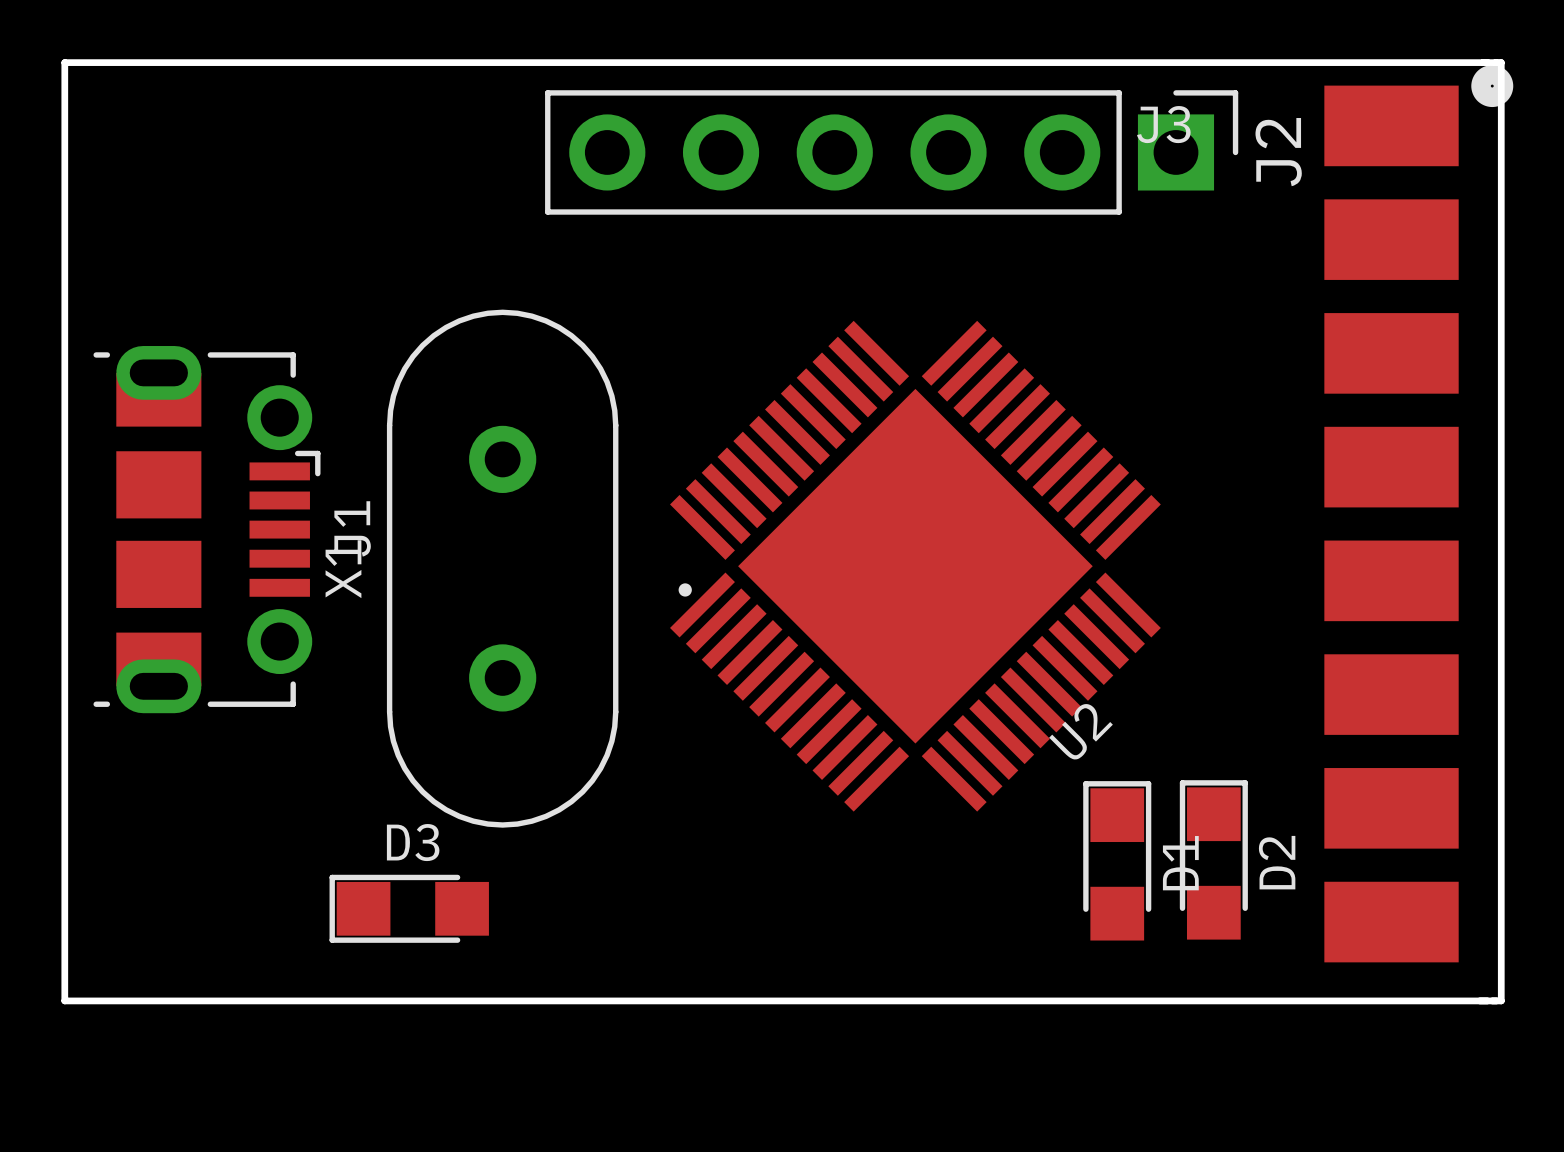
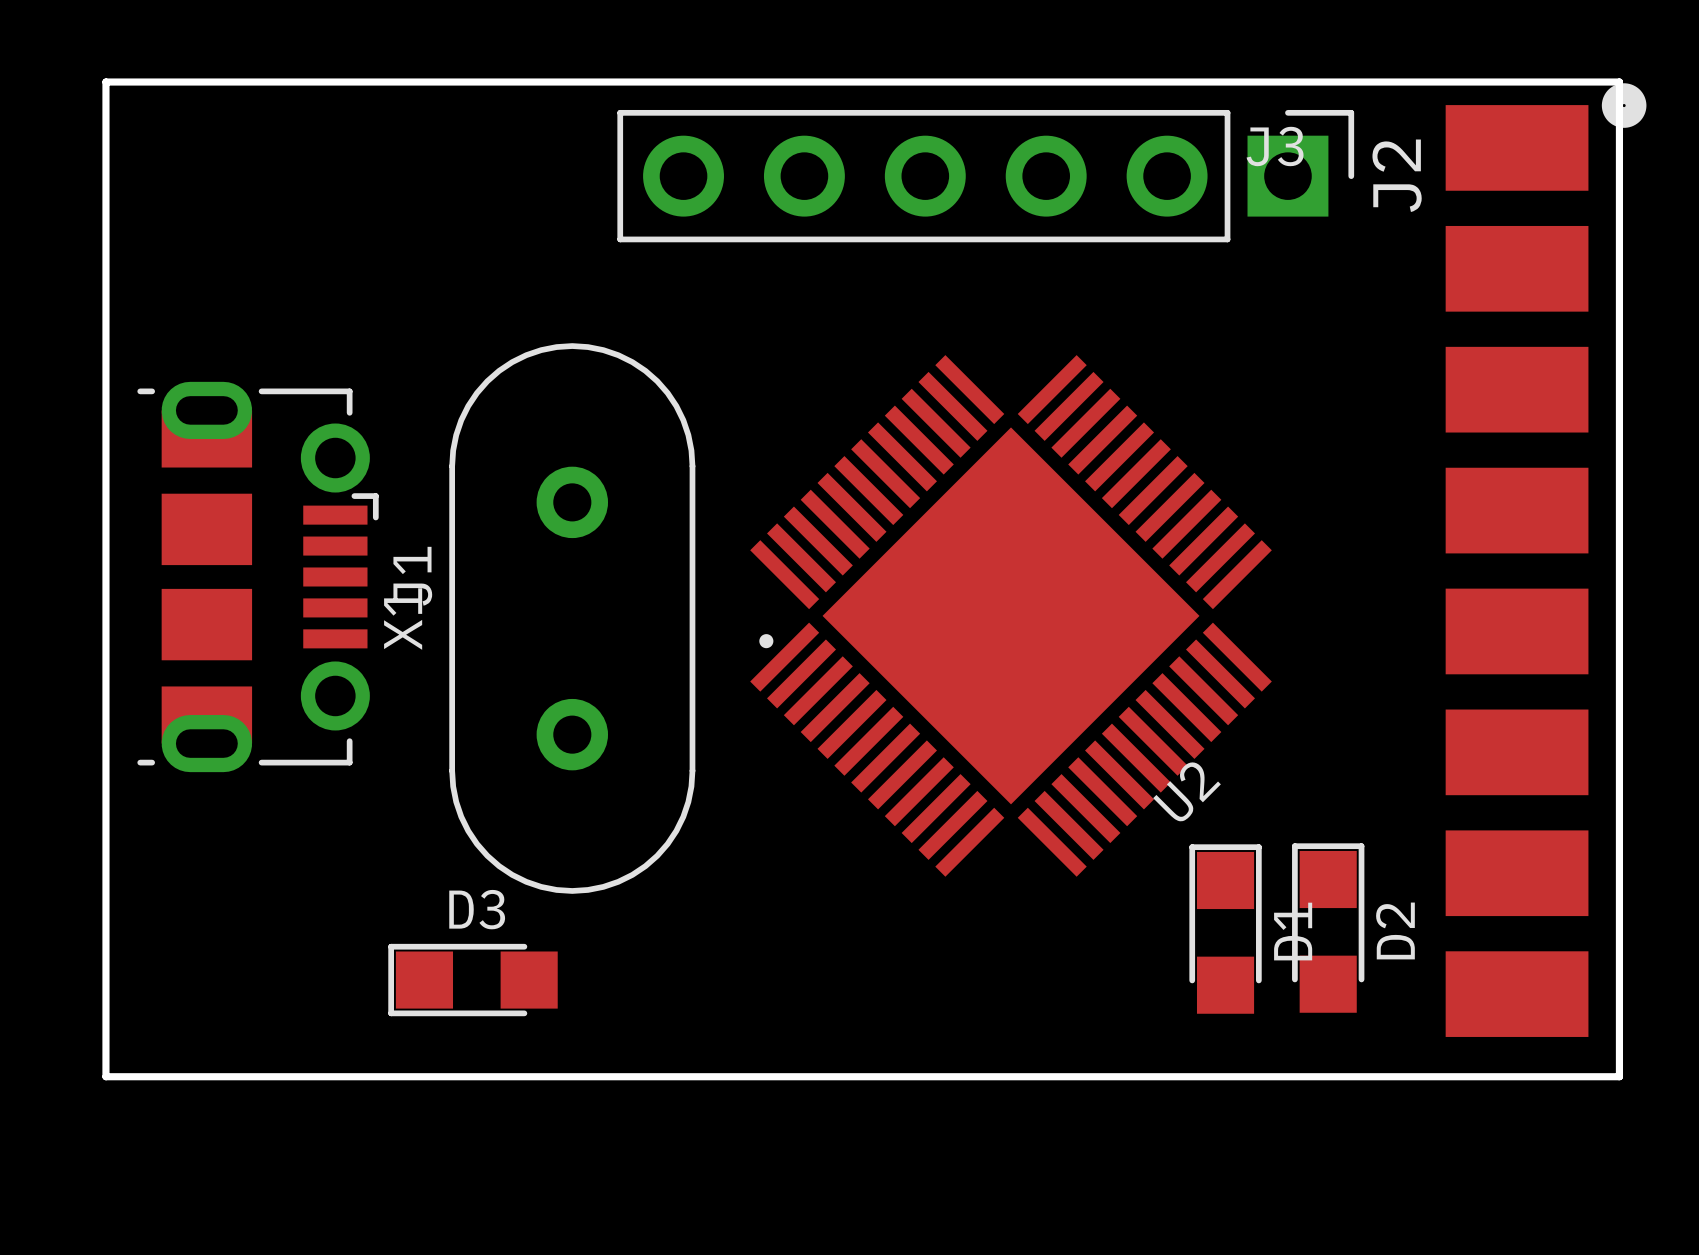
board edge: (64, 62) (1501, 62) (1501, 1000) (64, 1000) (64, 62) -> (105, 82) (105, 1076) (1619, 1076) (1619, 82) (105, 82)

